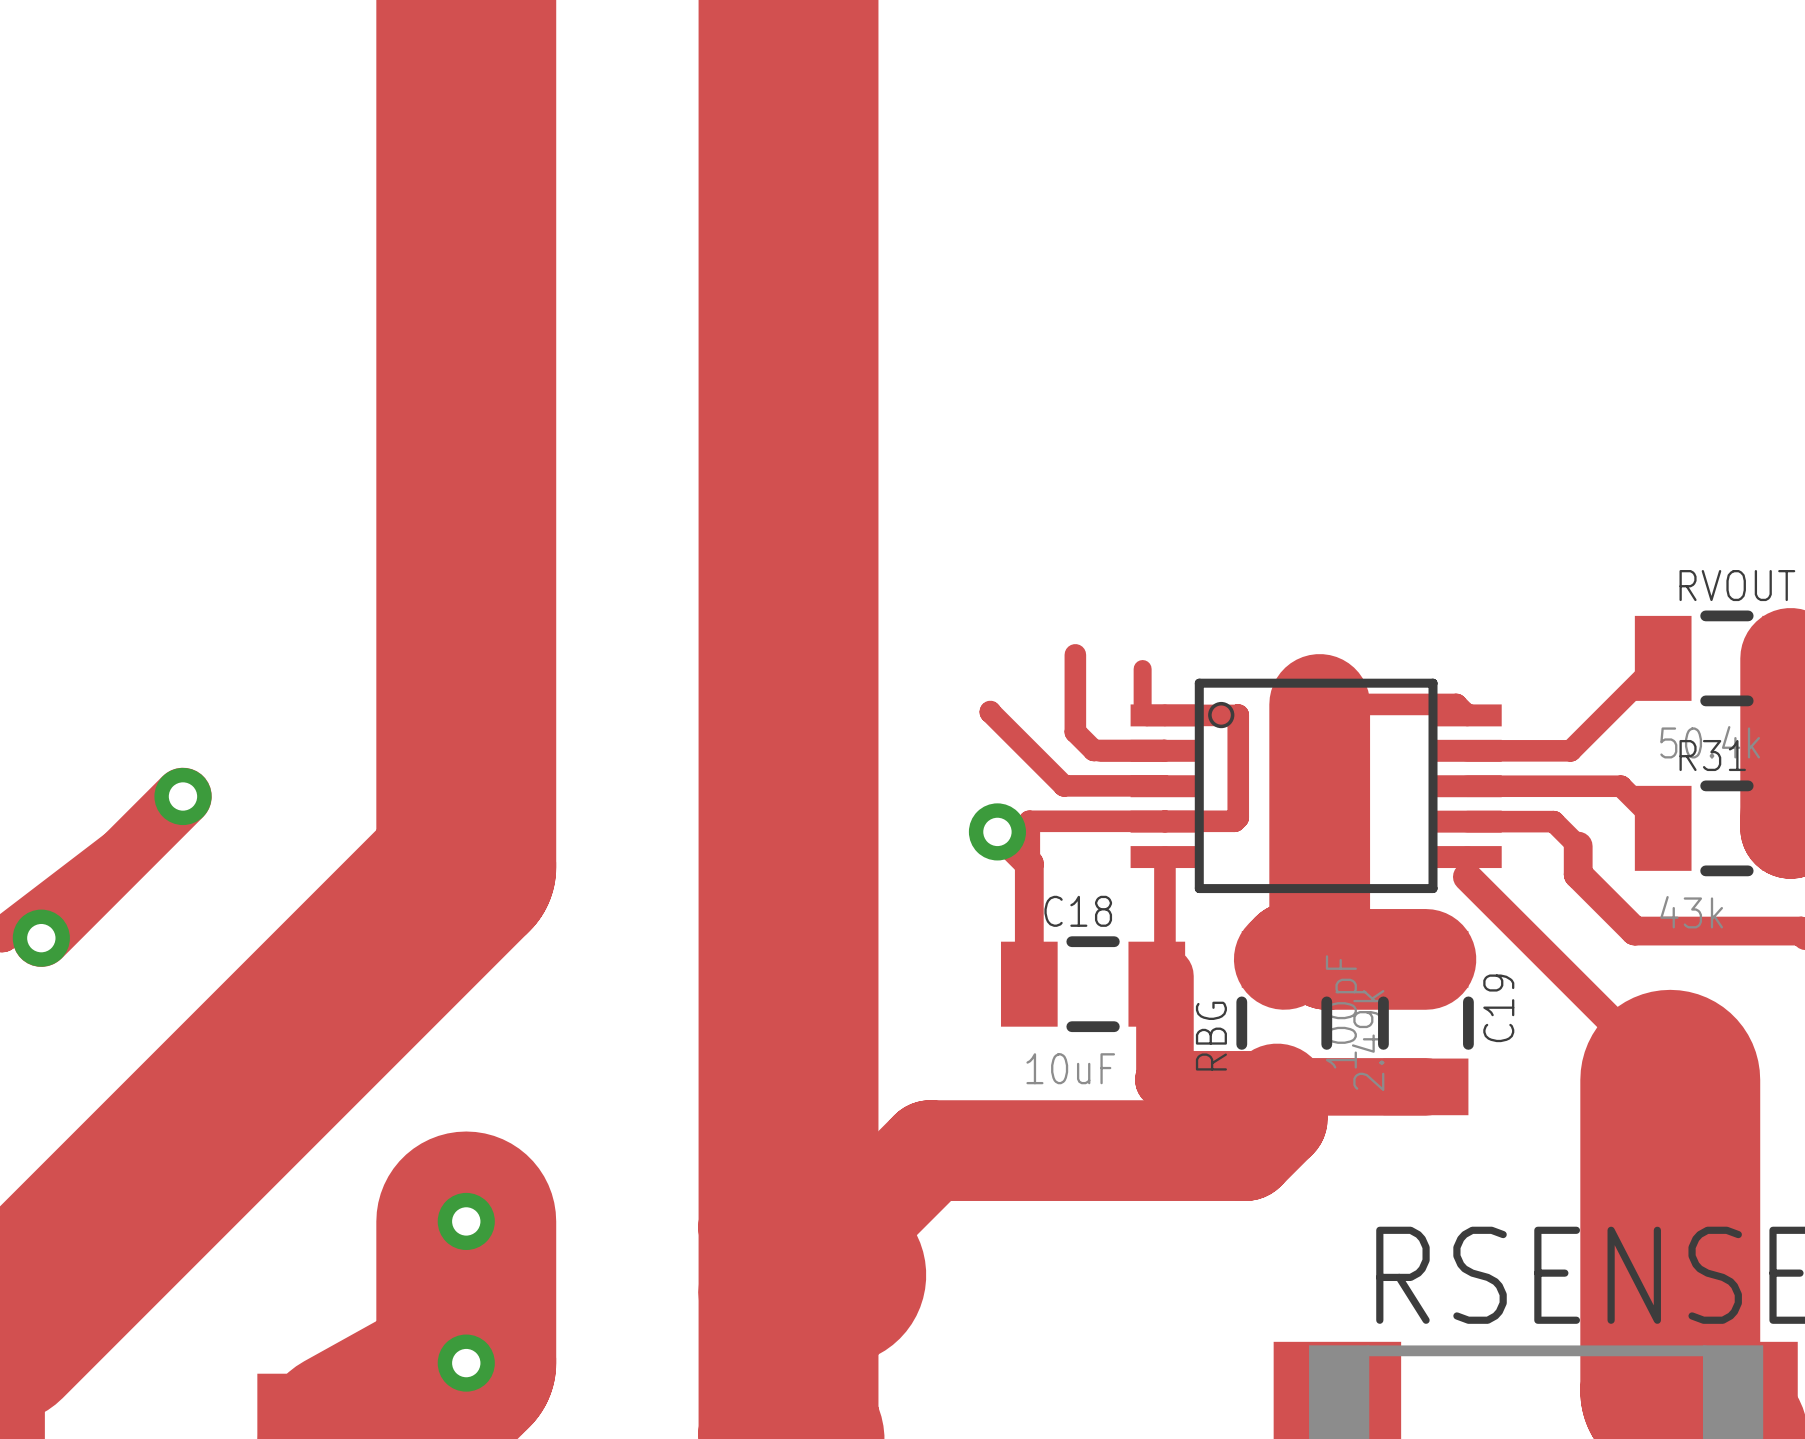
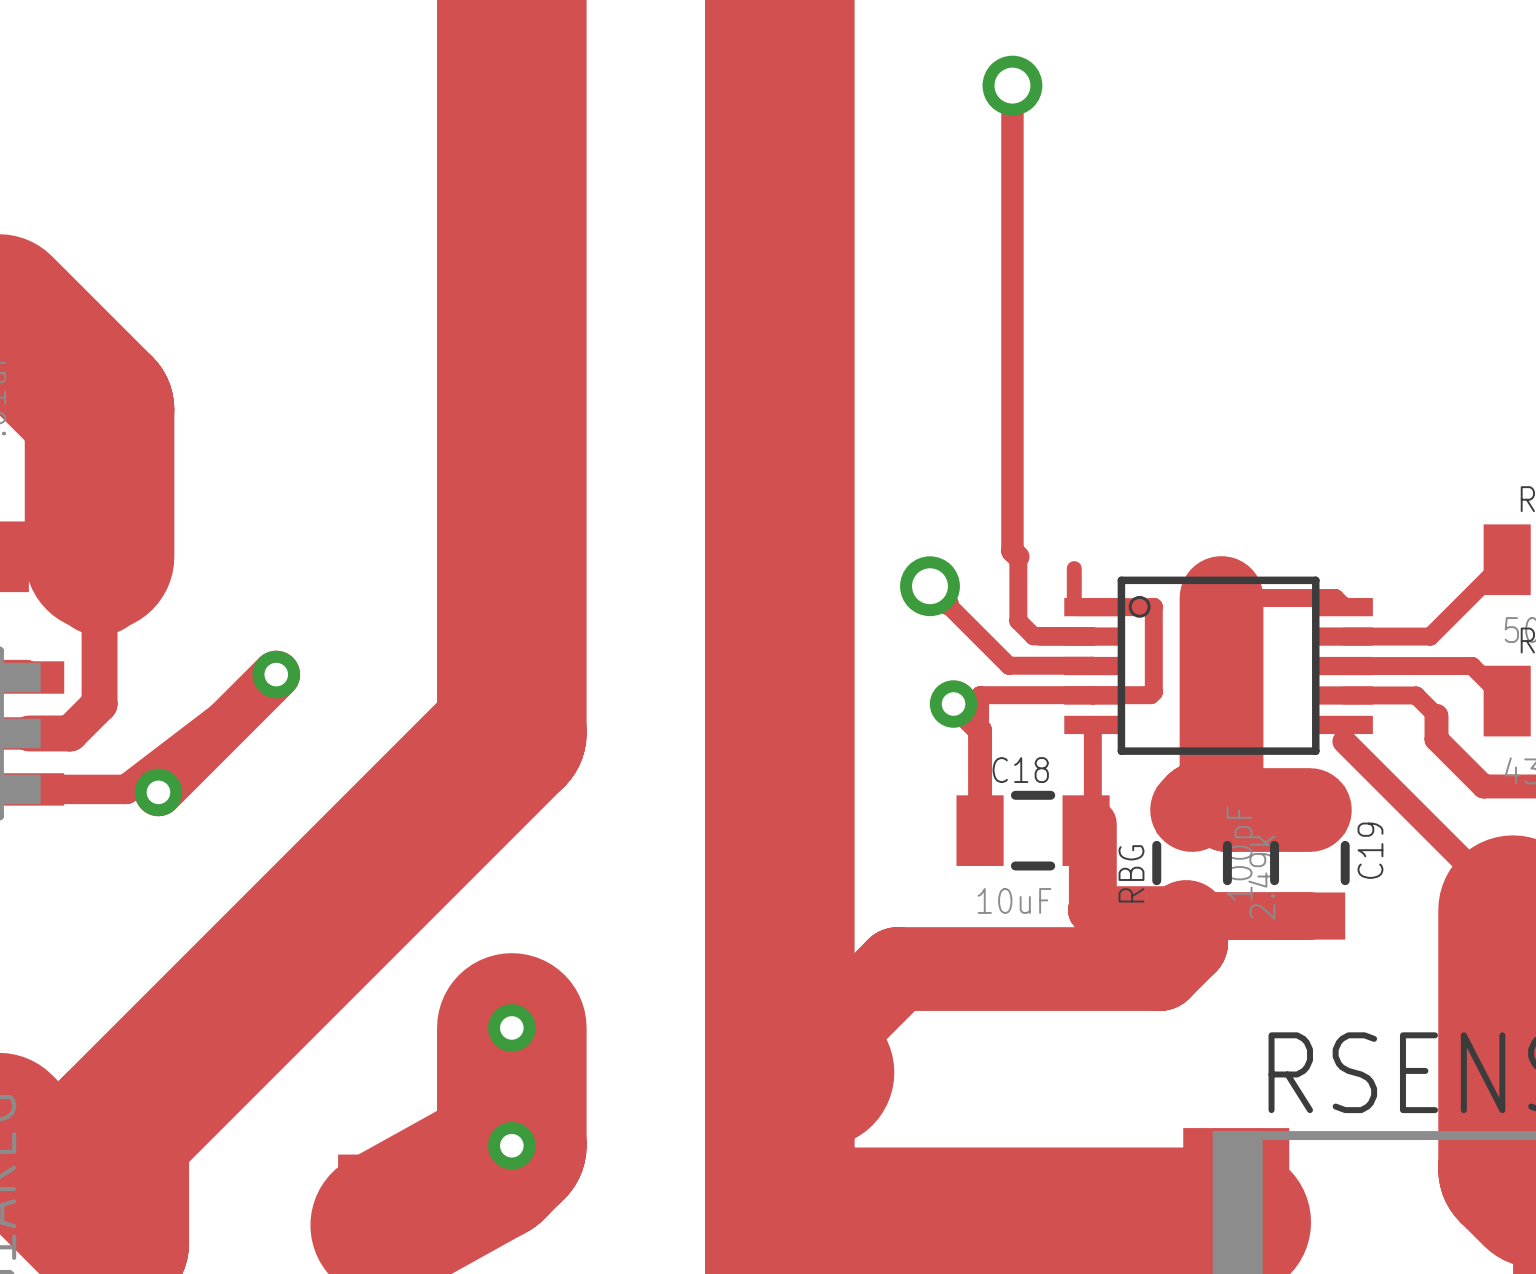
track: none -> (1012, 85) (1012, 550) (1018, 556)
via: none -> (1012, 85)
via: none -> (929, 586)

